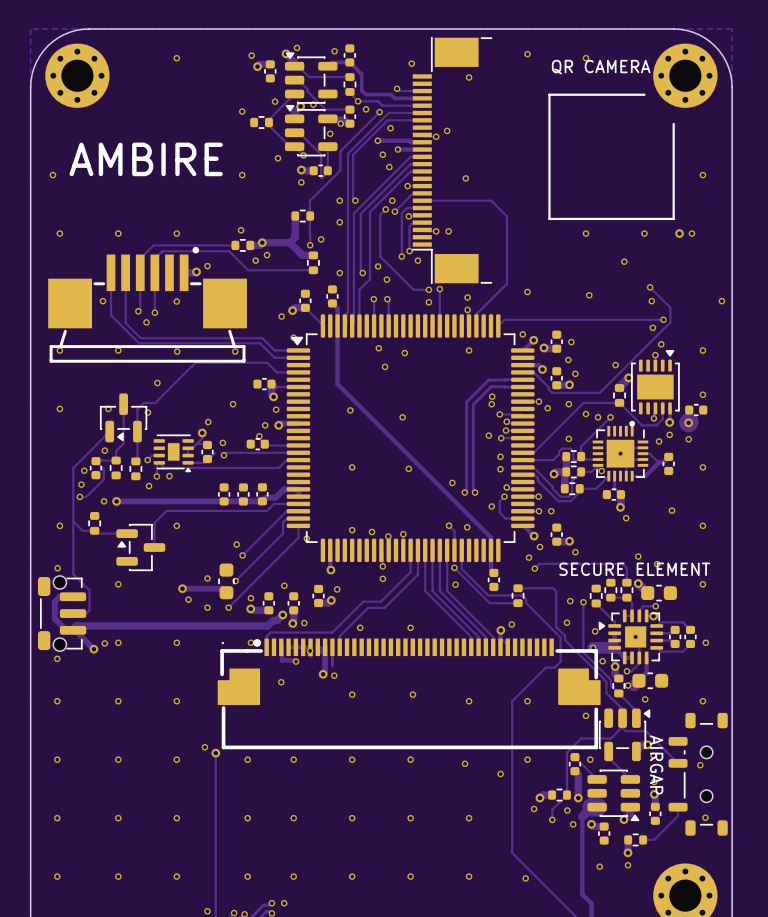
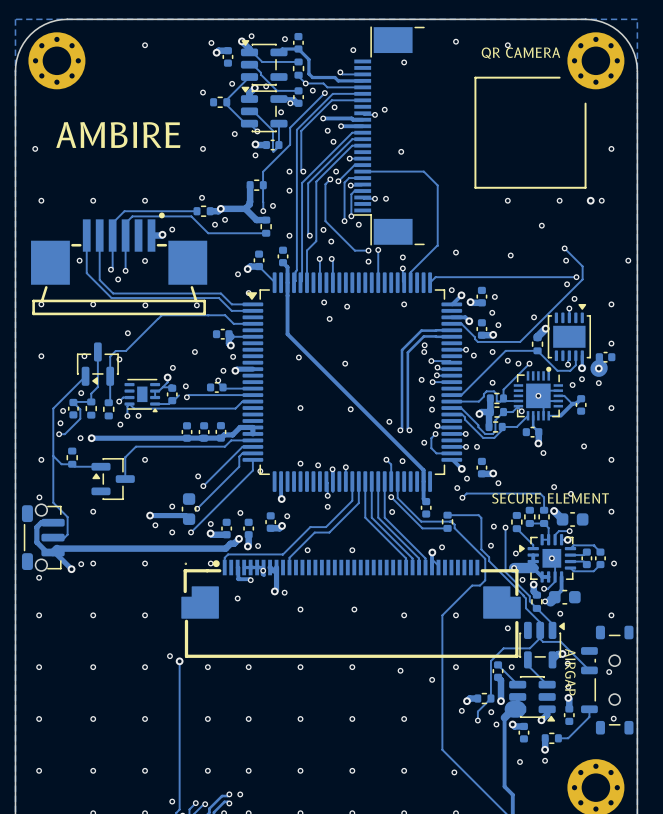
track: (332, 647) (332, 666) -> none

